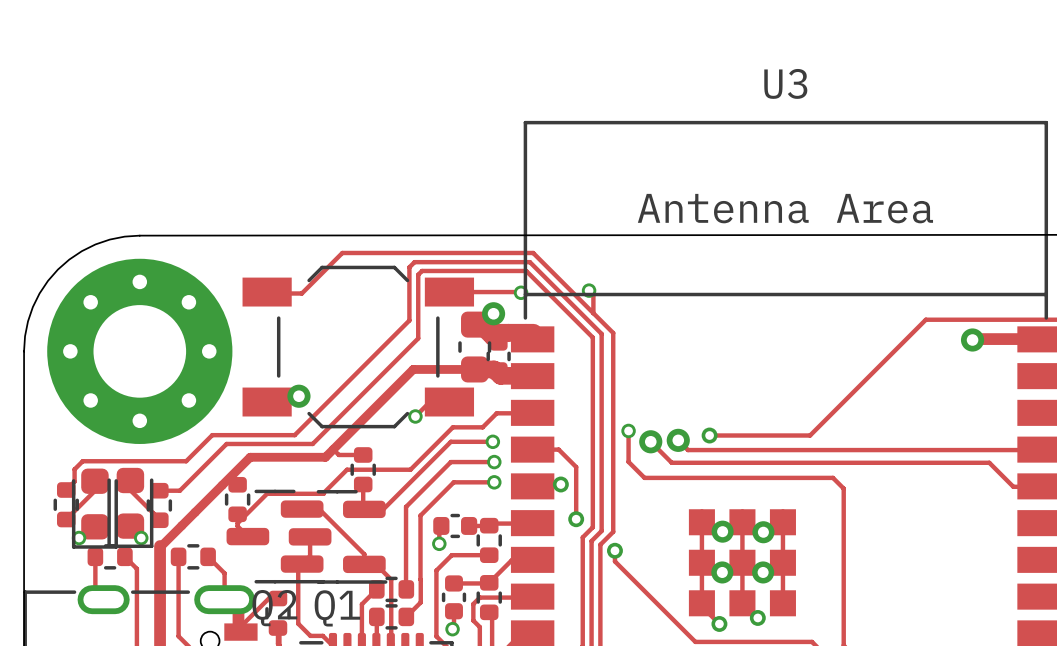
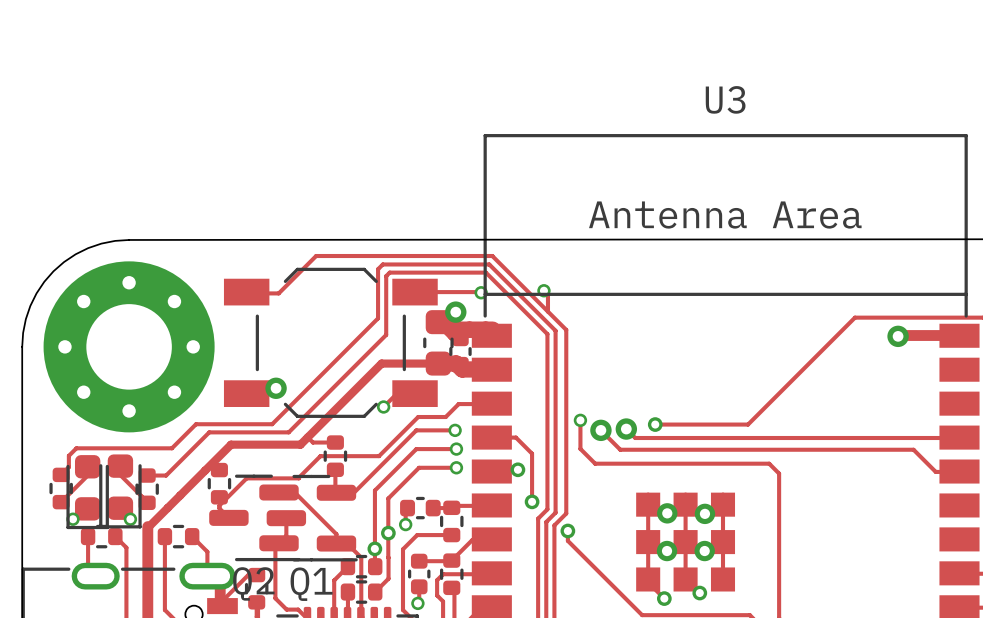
via: none -> (388, 533)
via: none -> (374, 548)

